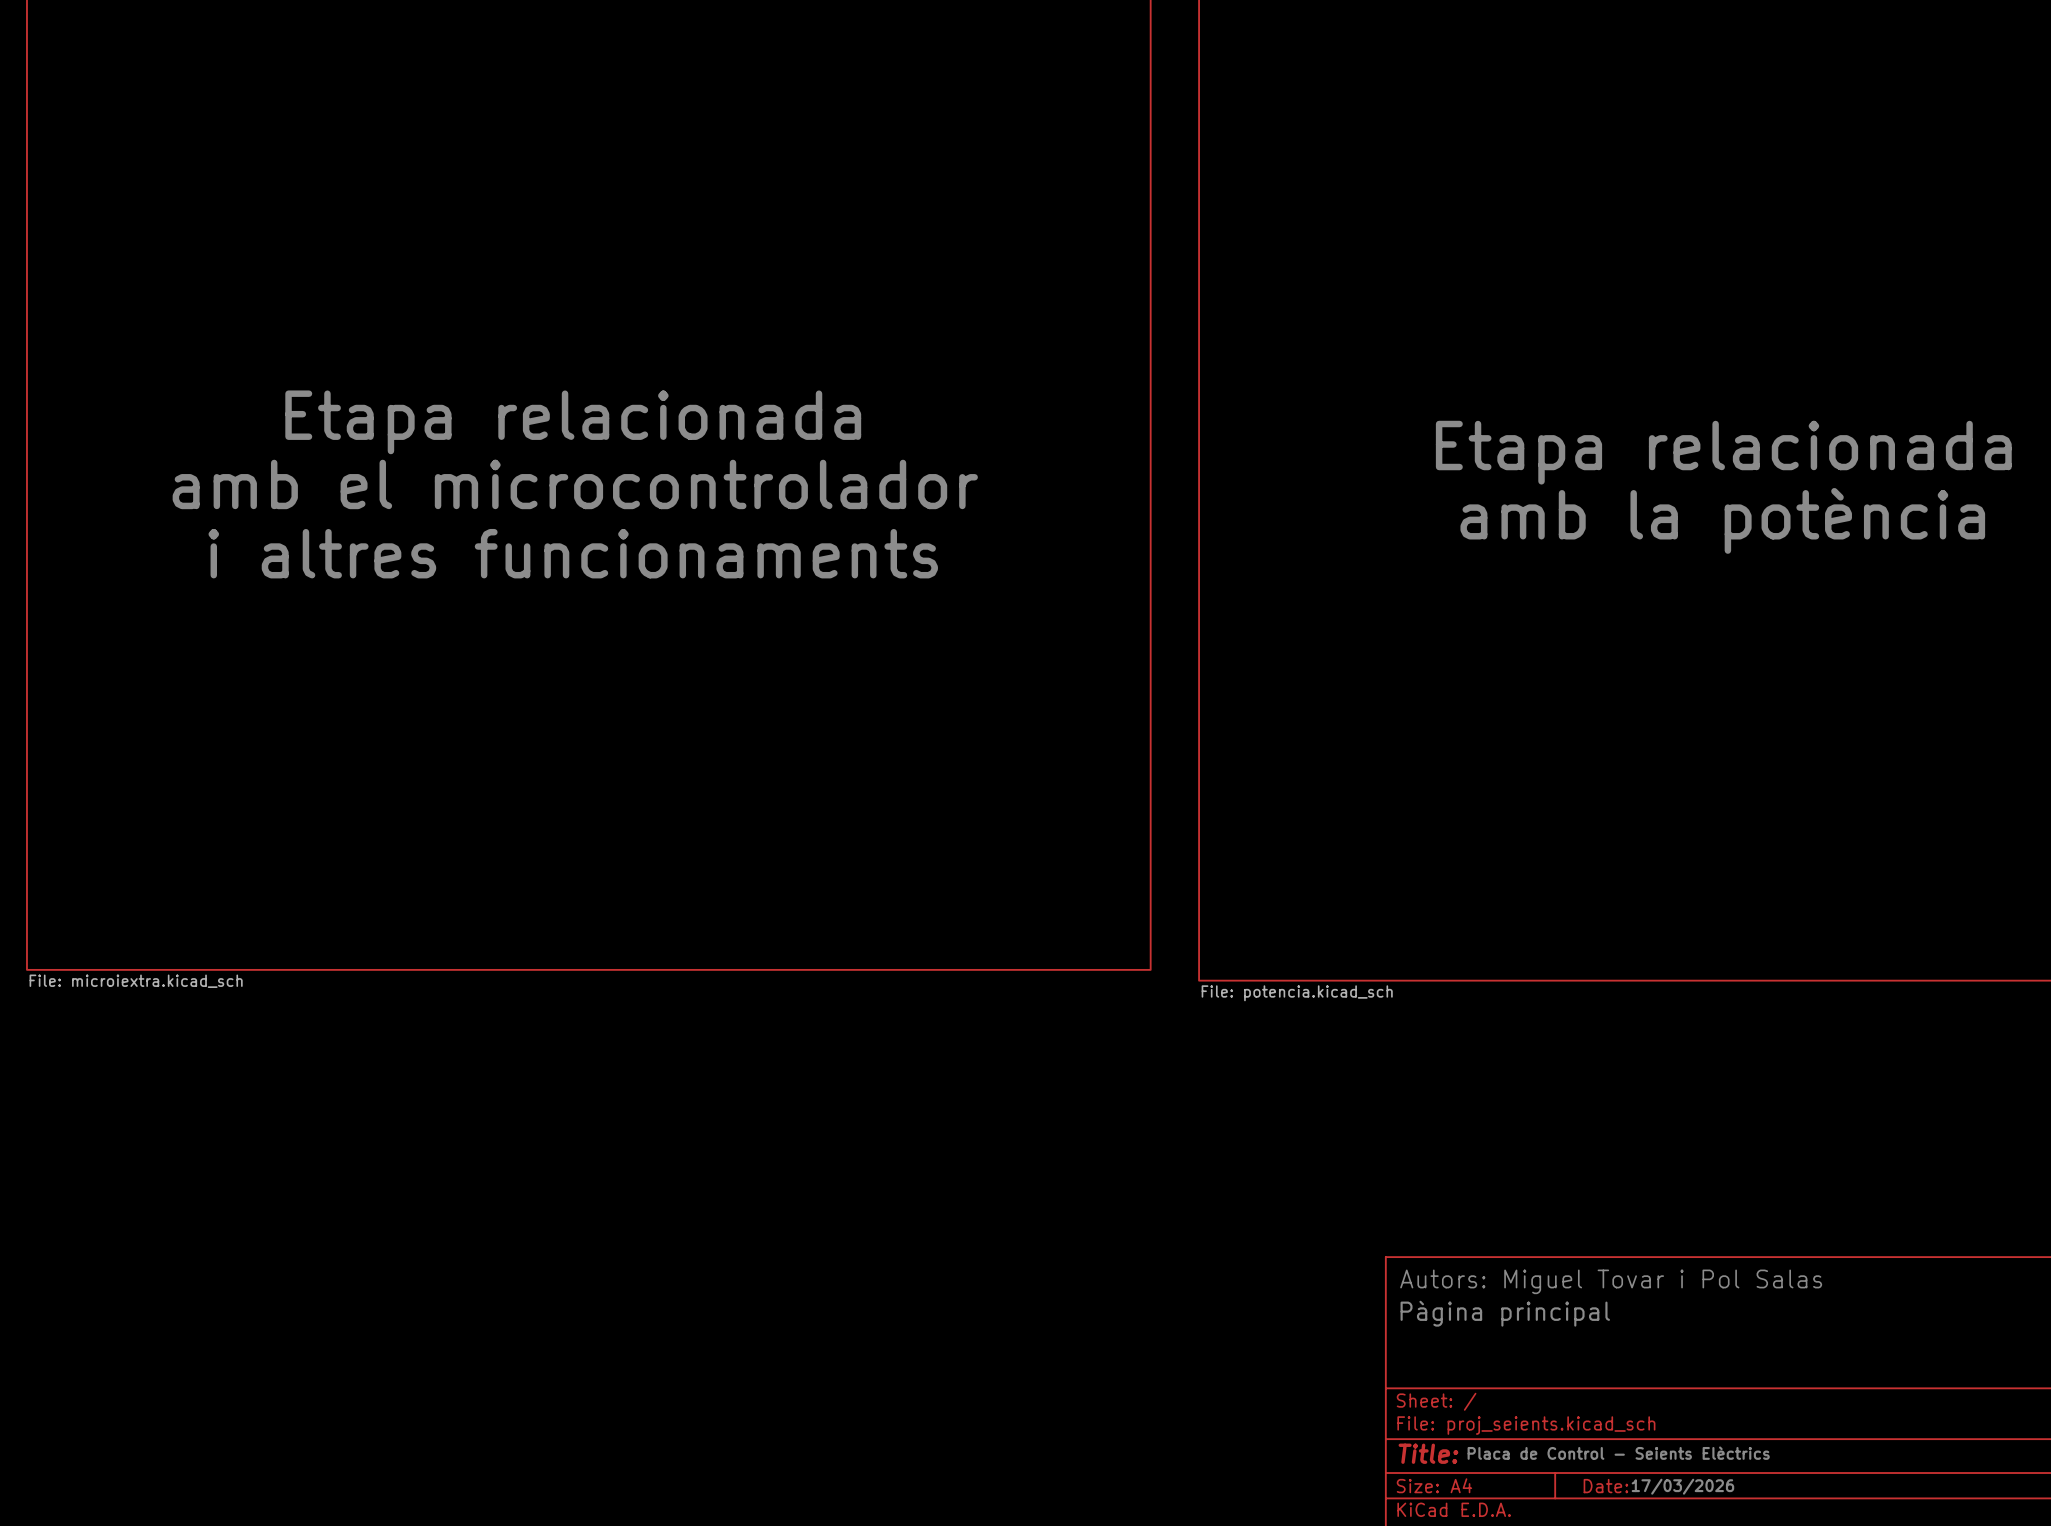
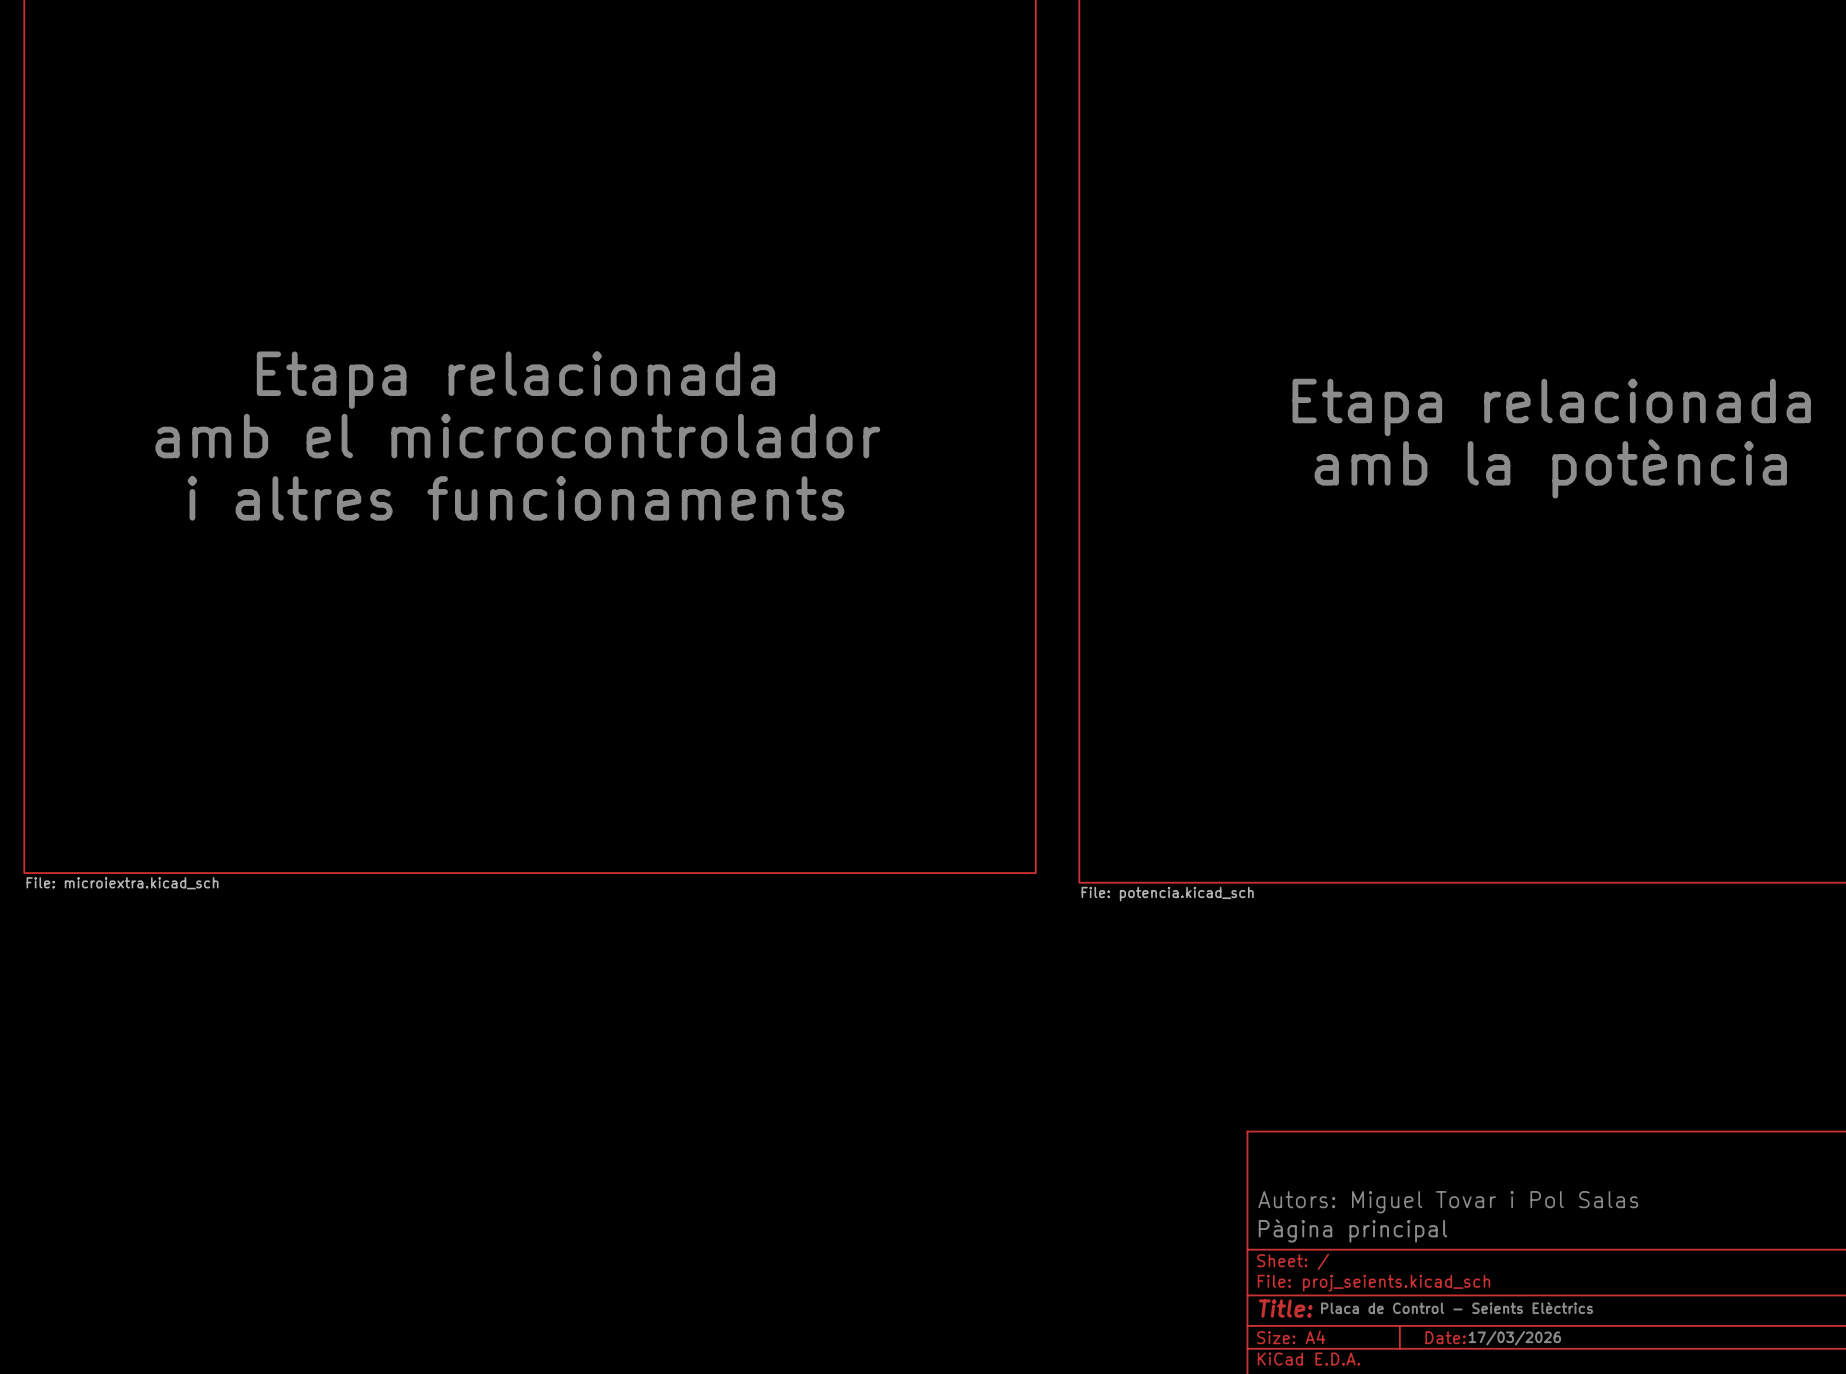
text position: Autors: Miguel Tovar i Pol Salas (1611, 1281) -> Autors: Miguel Tovar i Pol Salas (1448, 1202)
text position: Pàgina principal (1505, 1313) -> Pàgina principal (1353, 1230)

